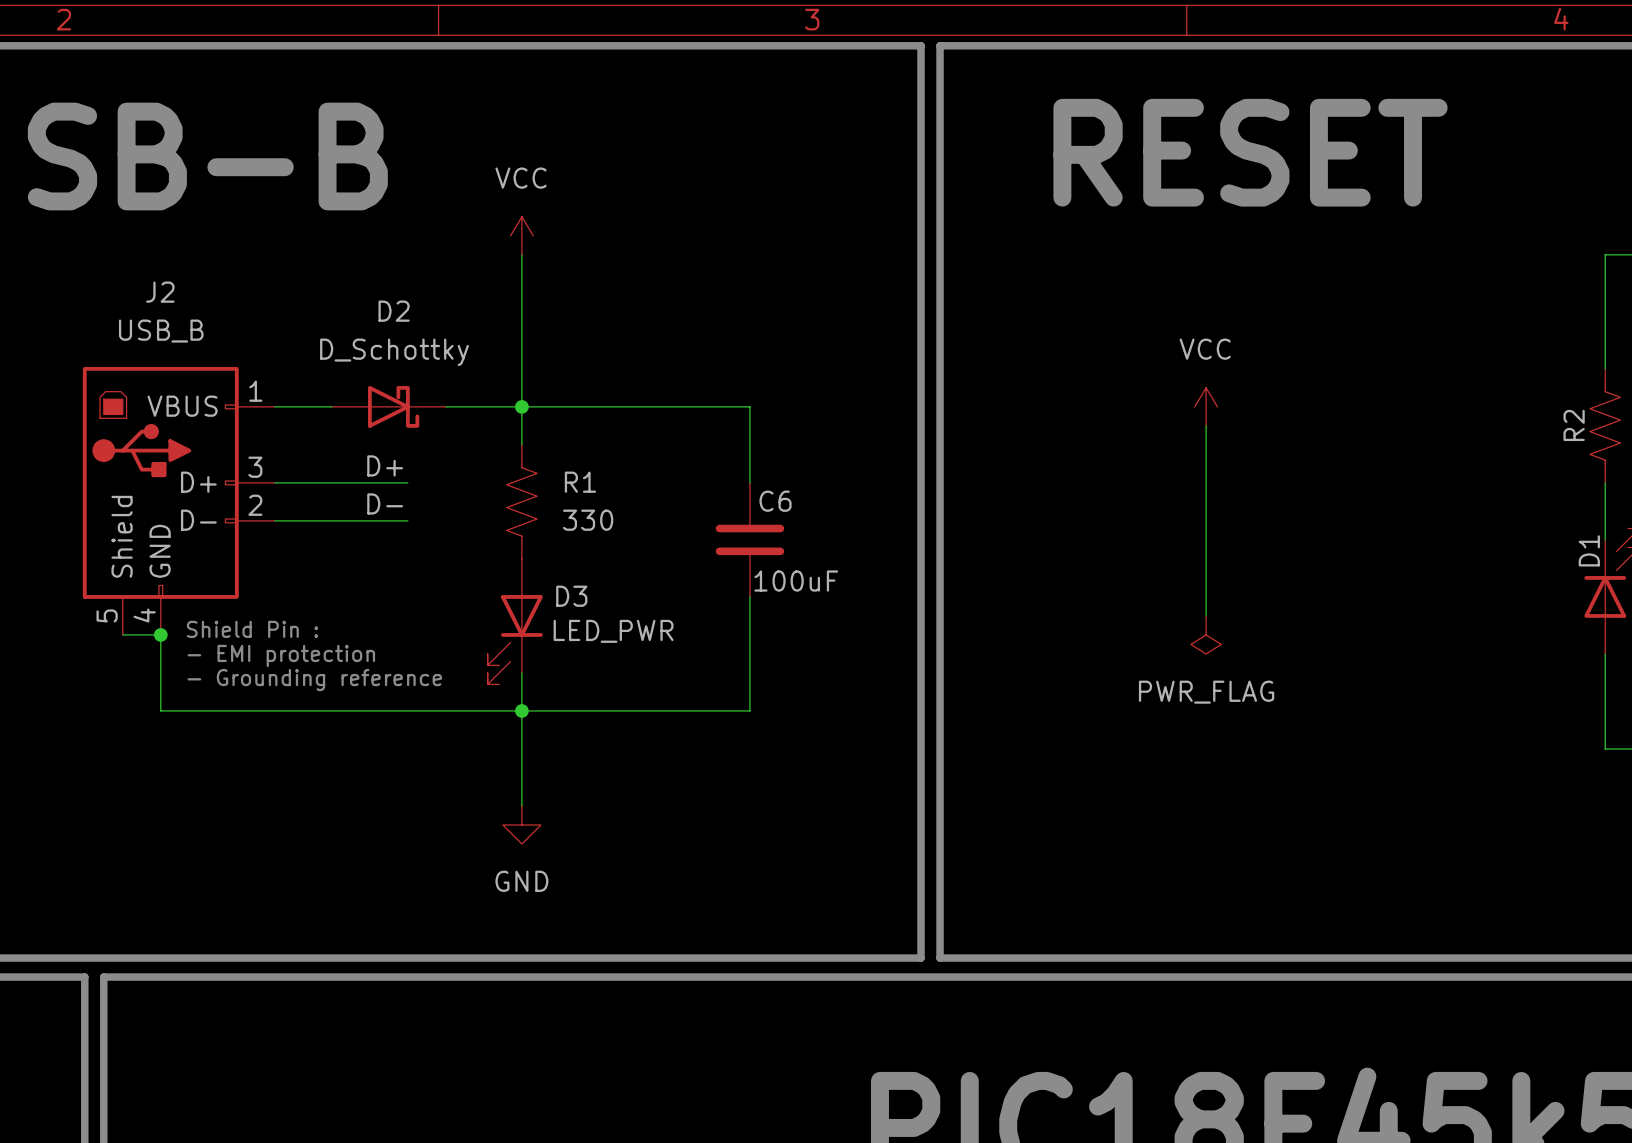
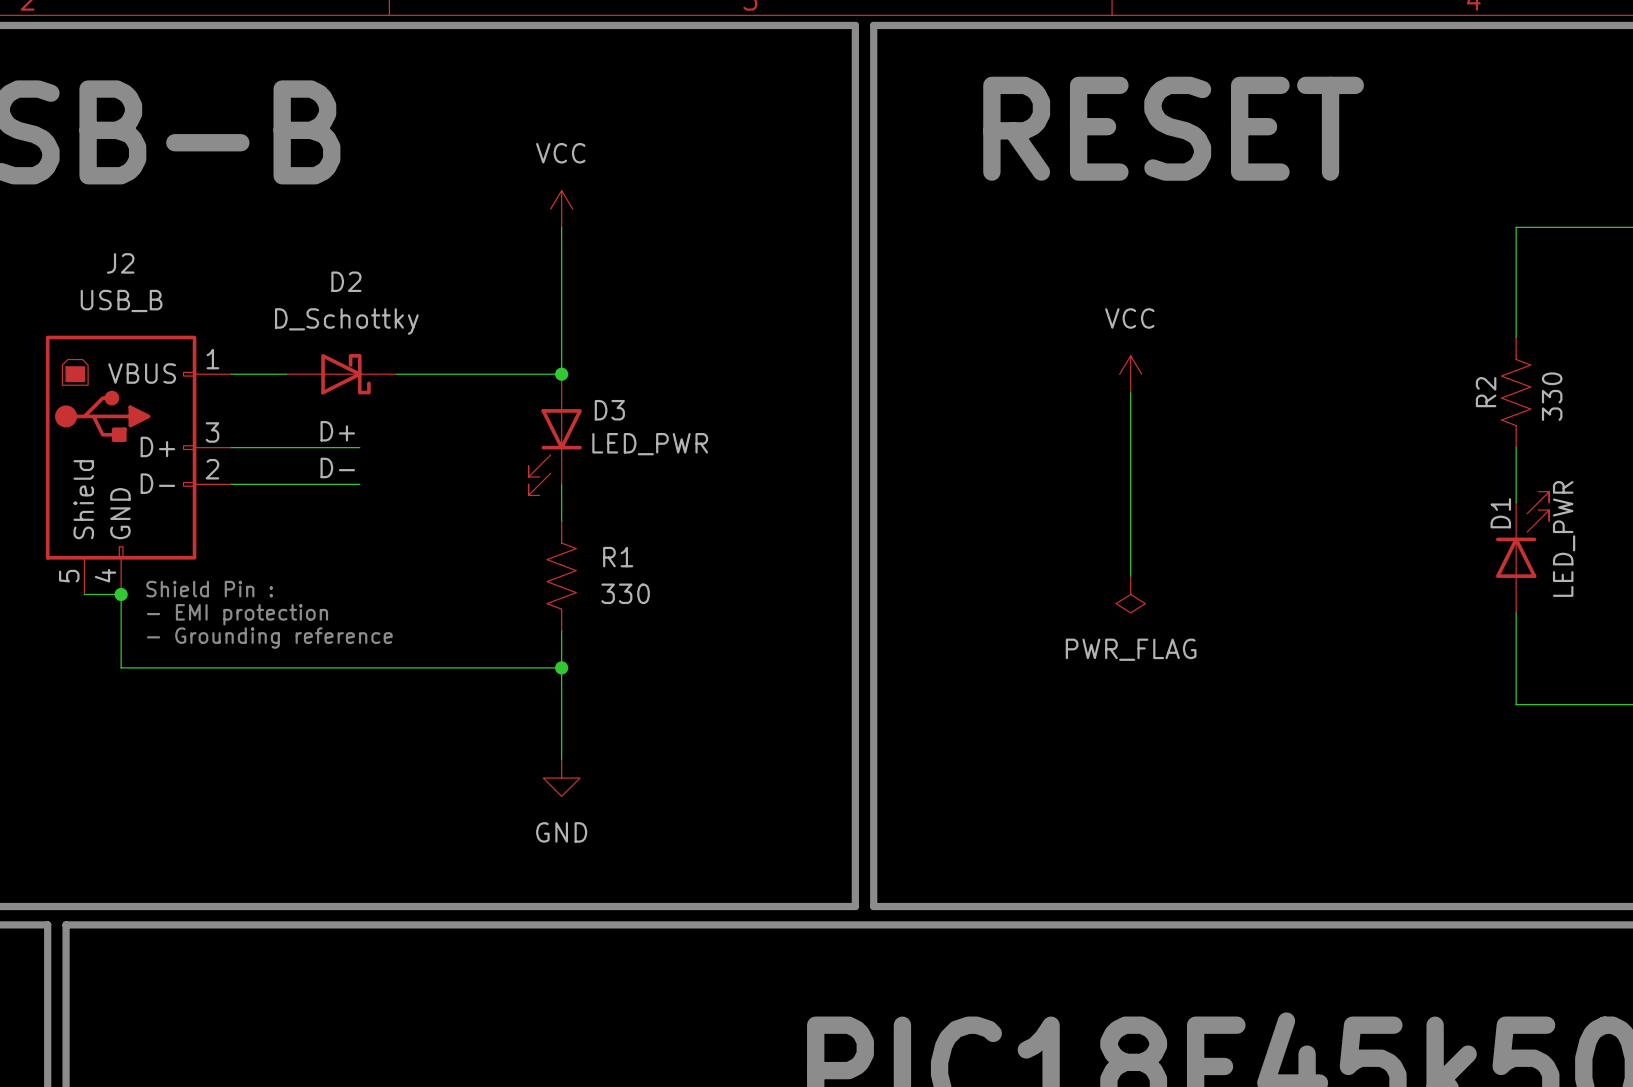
power symbol position: VCC (521, 235) -> VCC (561, 209)
wire: (521, 254) (521, 444) -> none
junction: (521, 406) -> none
wire: (616, 406) (749, 406) (749, 482) -> (561, 374) (561, 227)
junction: none -> (561, 374)
R1 position: (521, 501) -> (561, 576)
wire: none -> (561, 484) (561, 521)
C6: 100uF (749, 539) -> none
wire: (749, 596) (749, 710) (616, 710) -> none
D3 position: (515, 621) -> (555, 434)
wire: (521, 672) (521, 806) -> (561, 631) (561, 759)
junction: (521, 710) -> none
junction: none -> (561, 667)
power symbol position: GND (521, 825) -> GND (561, 778)

